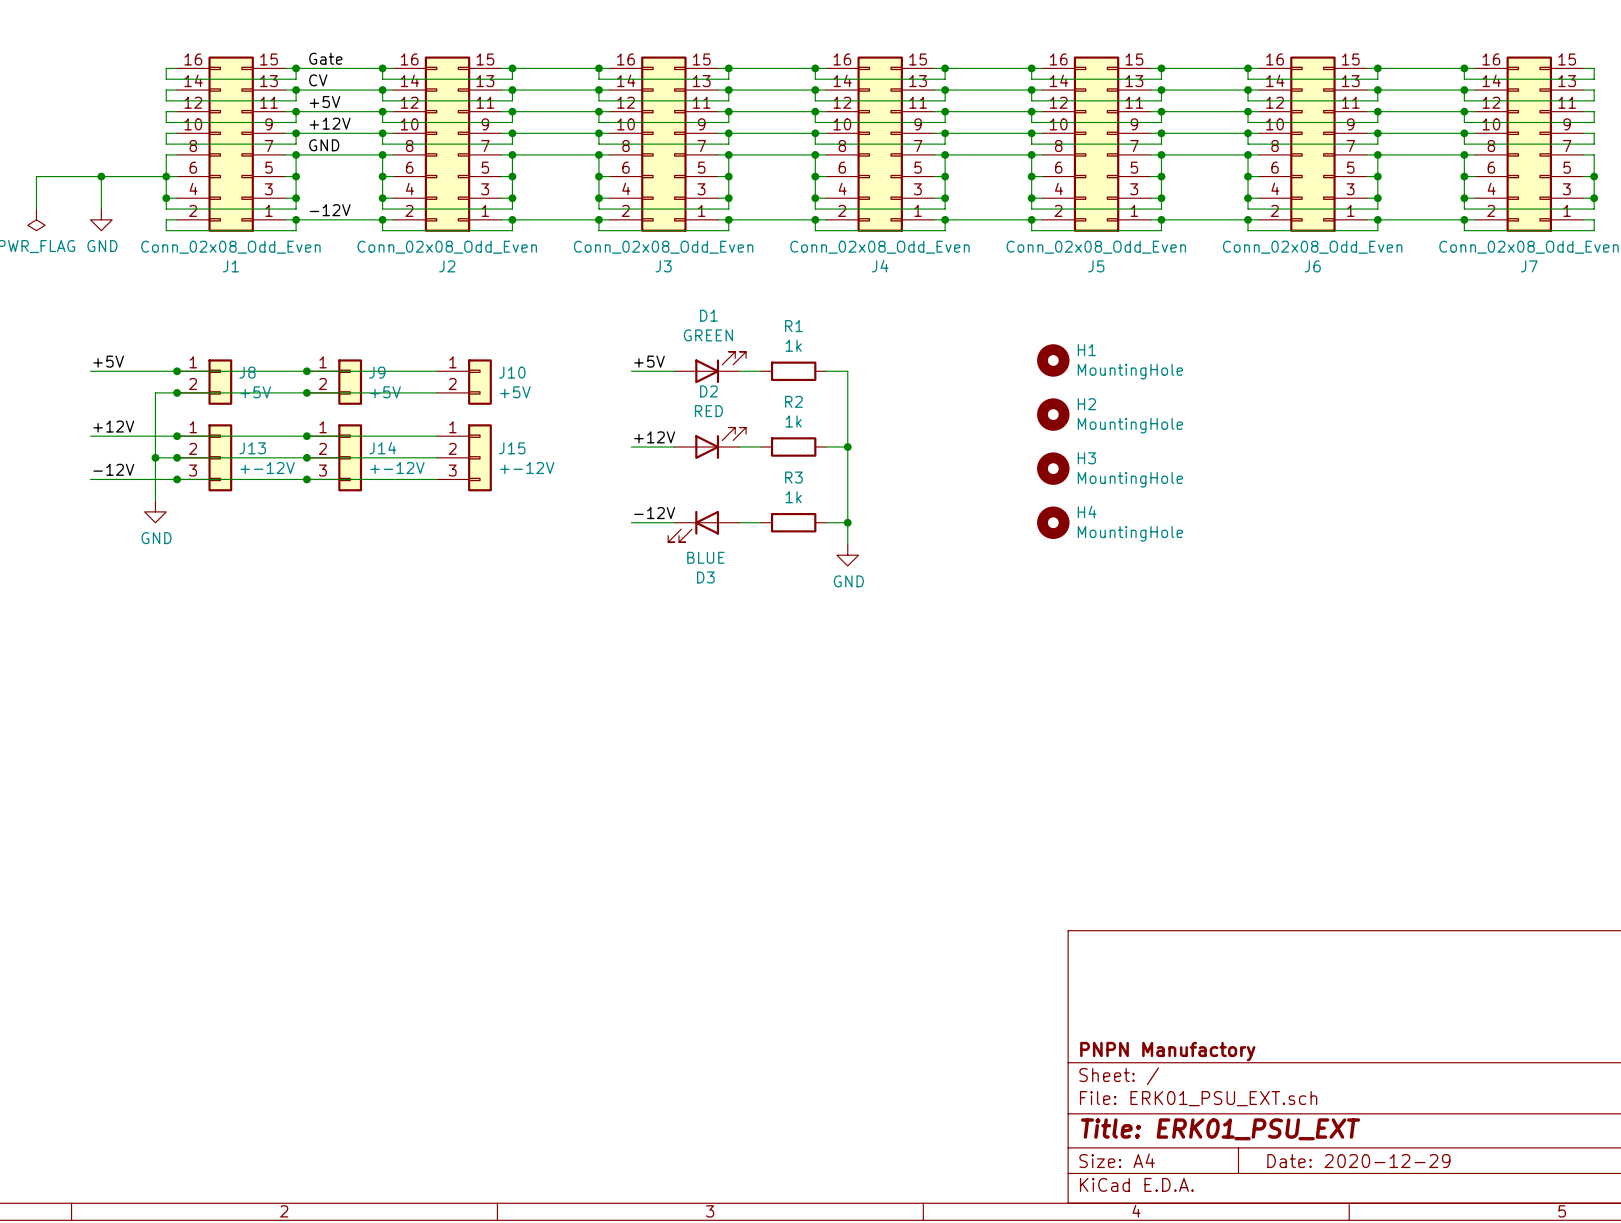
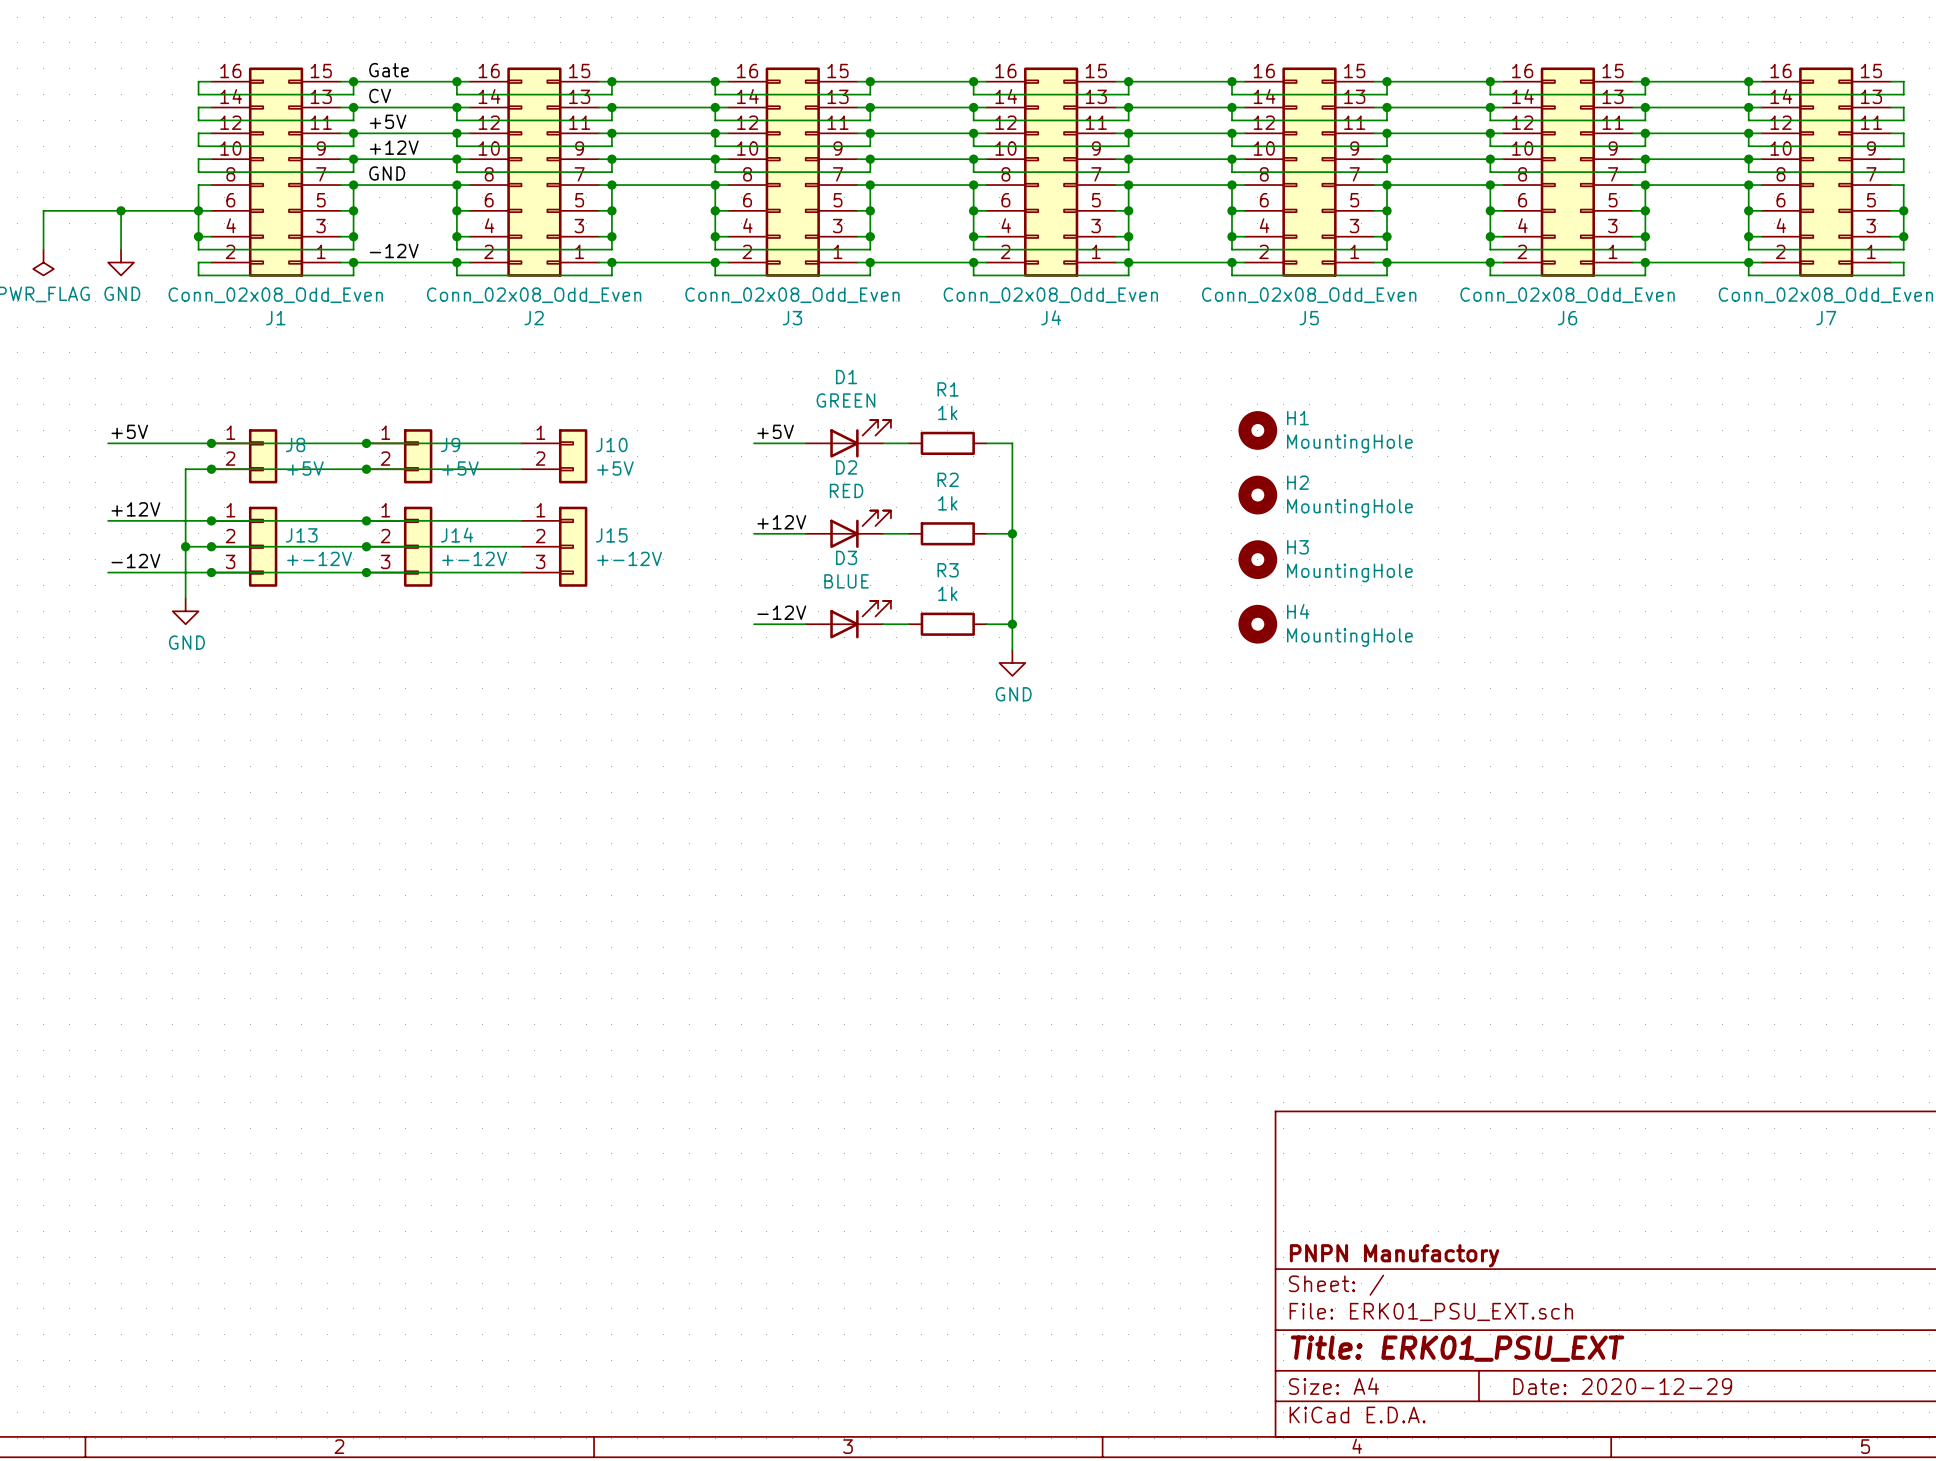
D3 rotation: 0° (693, 526) -> 180° (860, 619)

